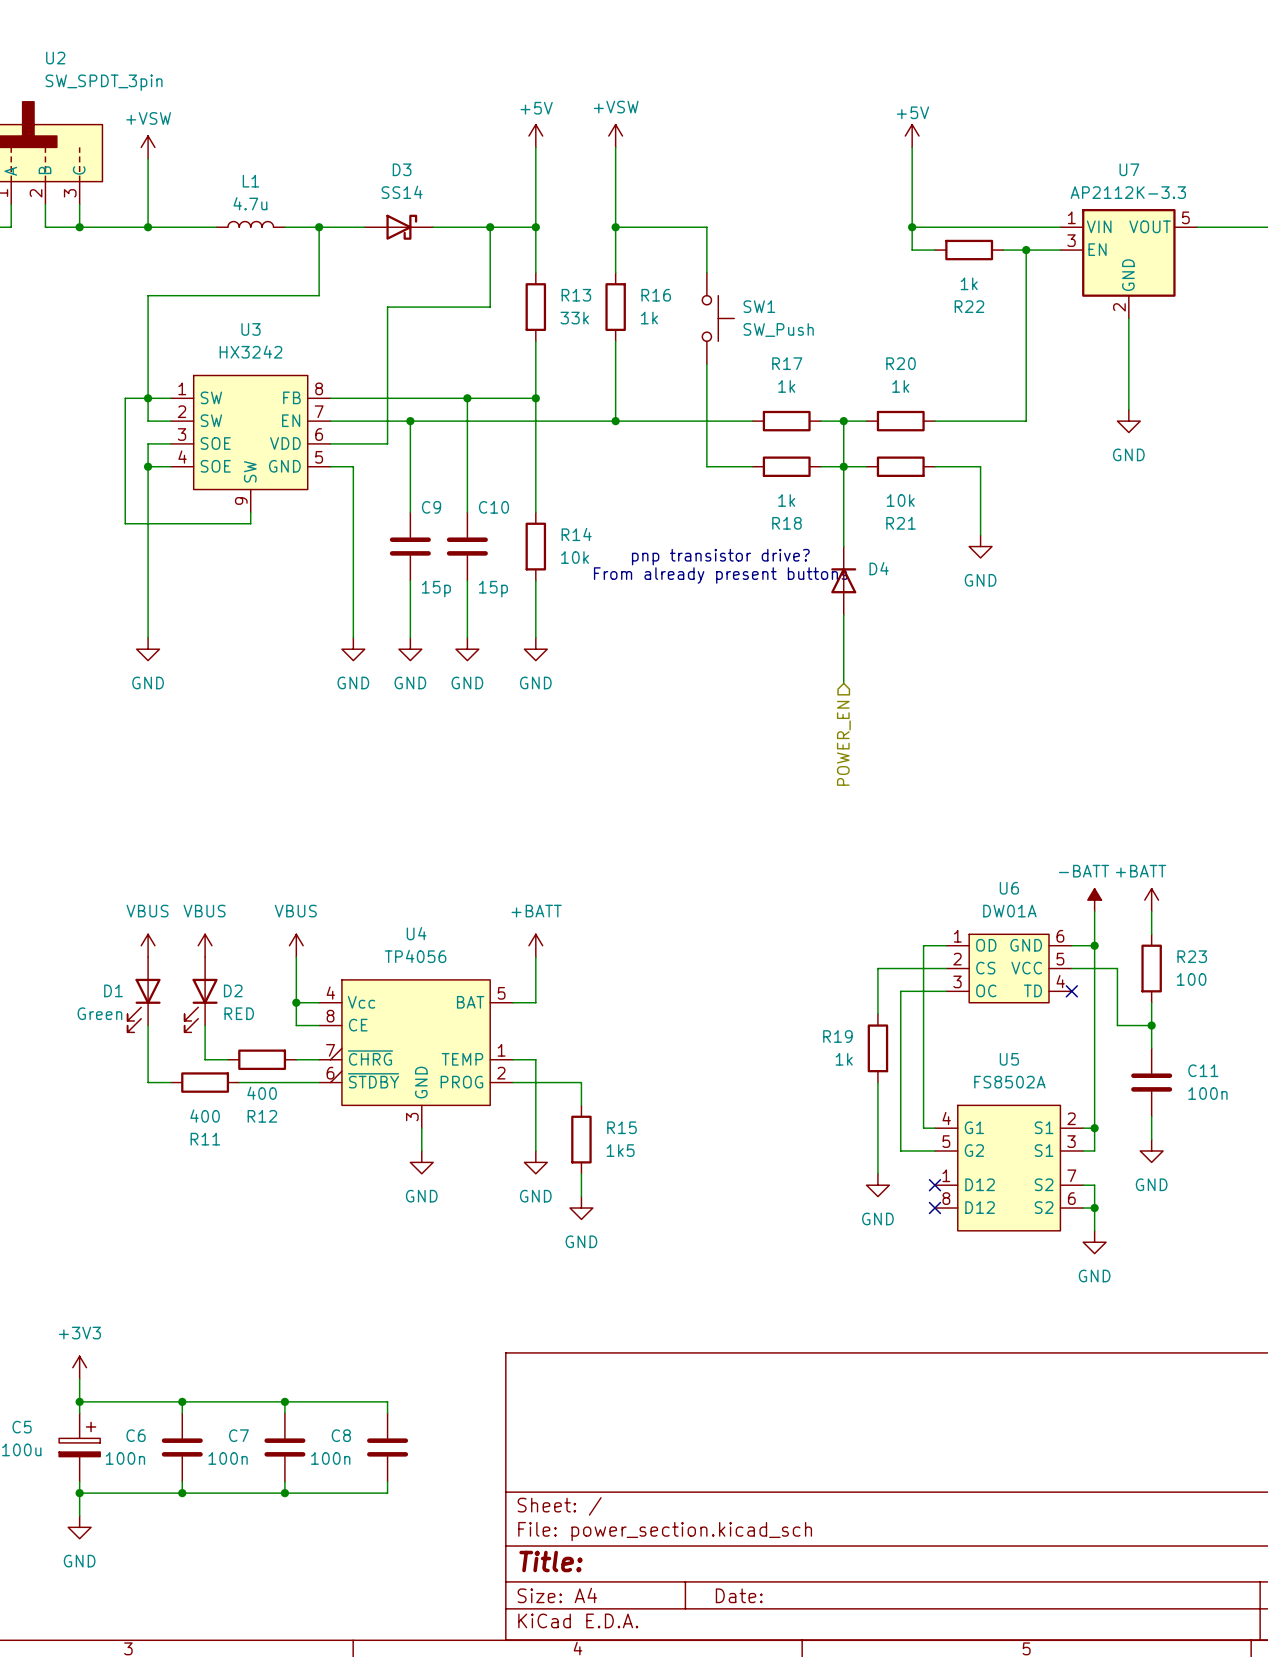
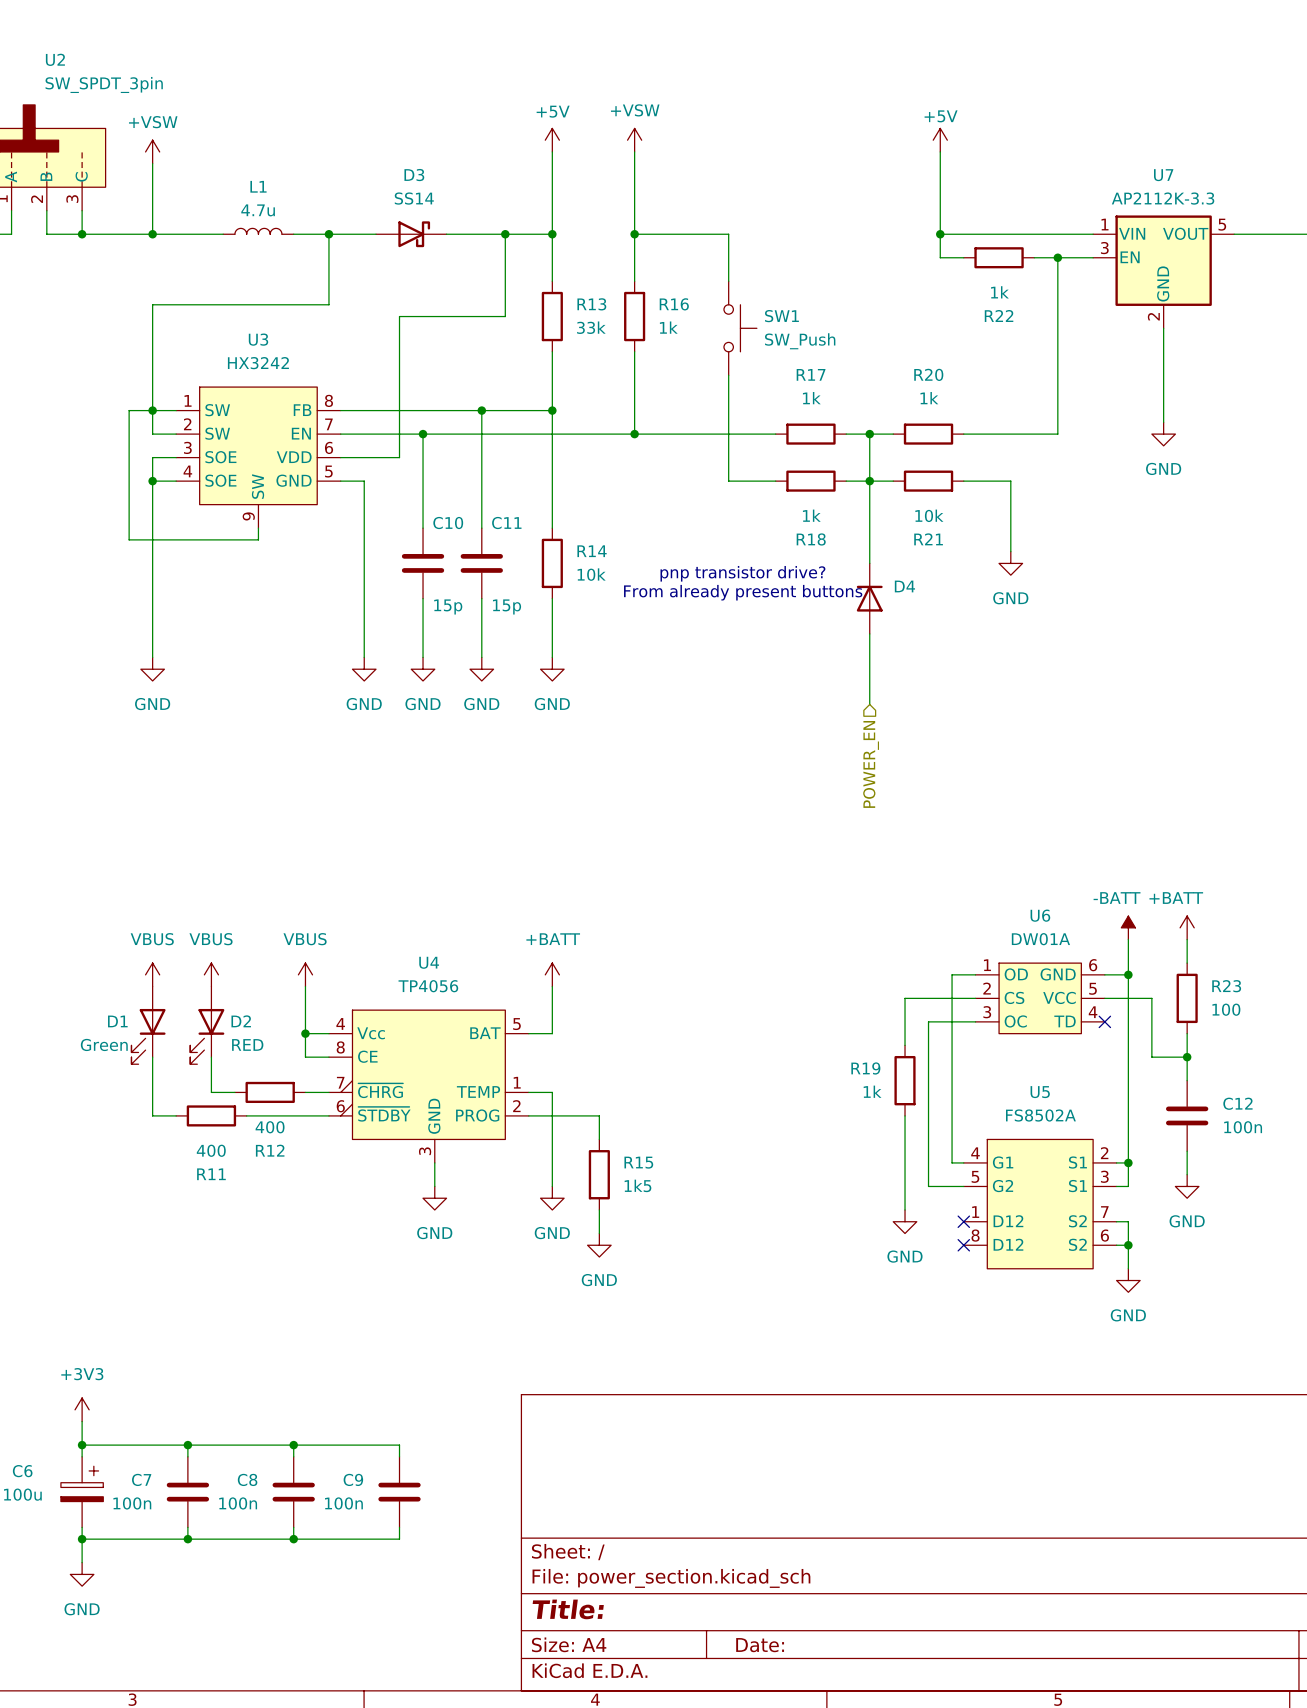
C9 name: C9 (431, 507) -> C10 (448, 523)
C10 name: C10 (493, 507) -> C11 (506, 523)
C11 name: C11 (1203, 1070) -> C12 (1237, 1103)
C5 name: C5 (22, 1427) -> C6 (22, 1471)
C6 name: C6 (136, 1435) -> C7 (141, 1479)
C7 name: C7 (238, 1435) -> C8 (247, 1479)
C8 name: C8 (341, 1435) -> C9 (353, 1479)

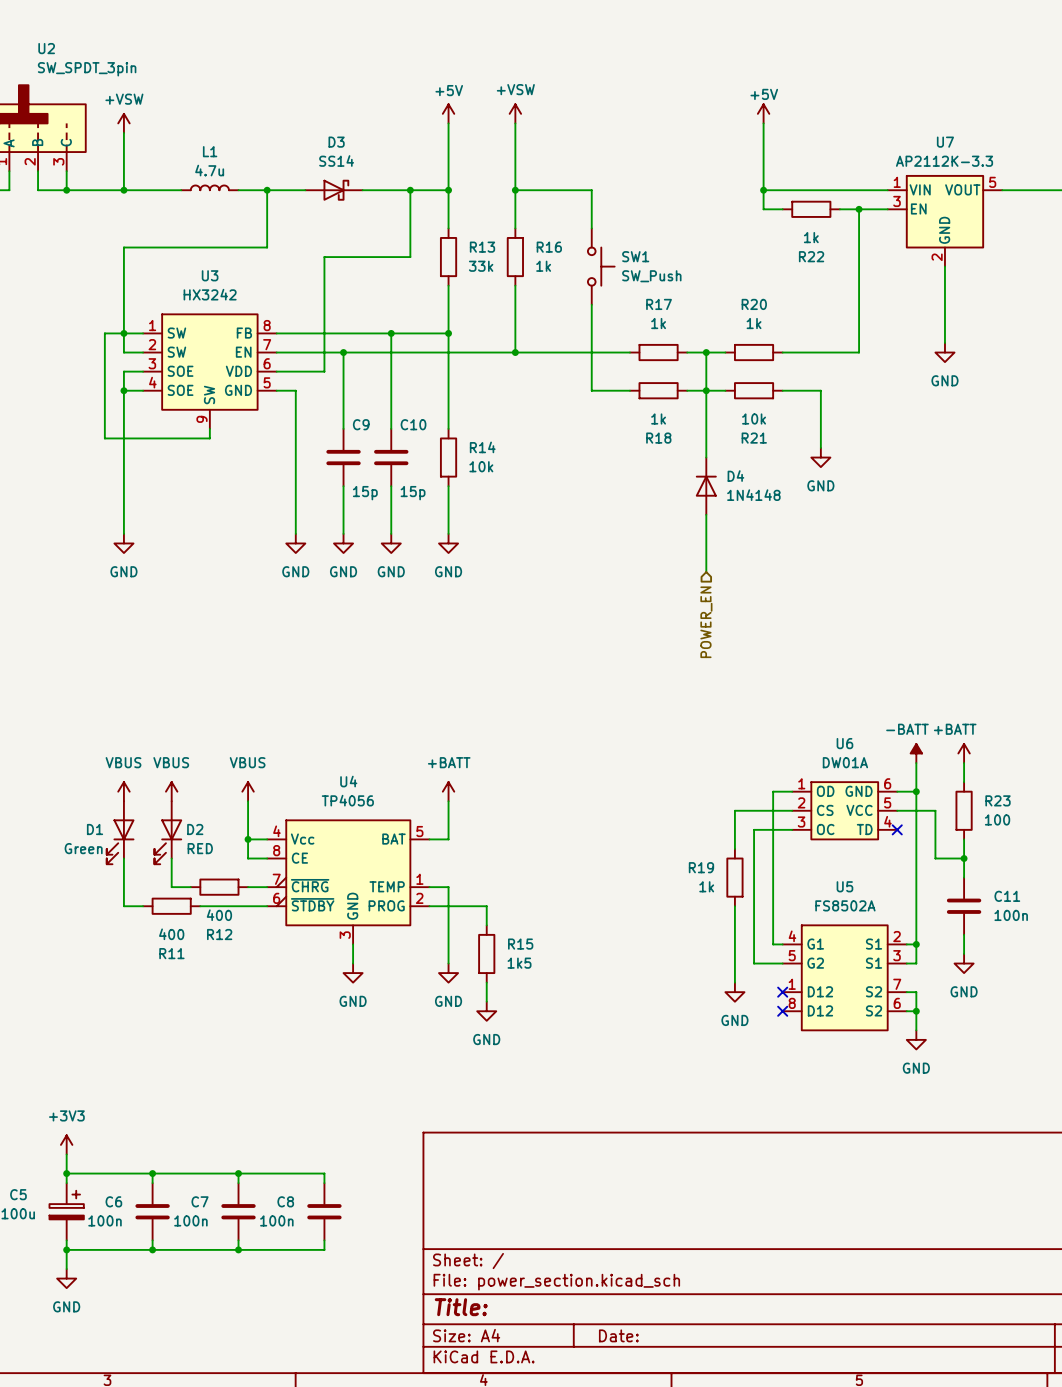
C10 name: C10 (448, 523) -> C9 (361, 424)
C11 name: C11 (506, 523) -> C10 (413, 424)
text: pnp transistor drive? (742, 573) -> none
text: From already present buttons (743, 592) -> none
D4 value: none -> 1N4148 (753, 495)
C12 name: C12 (1237, 1103) -> C11 (1007, 896)
C6 name: C6 (22, 1471) -> C5 (18, 1194)
C7 name: C7 (141, 1479) -> C6 (113, 1201)
C8 name: C8 (247, 1479) -> C7 (200, 1201)
C9 name: C9 (353, 1479) -> C8 (285, 1201)

